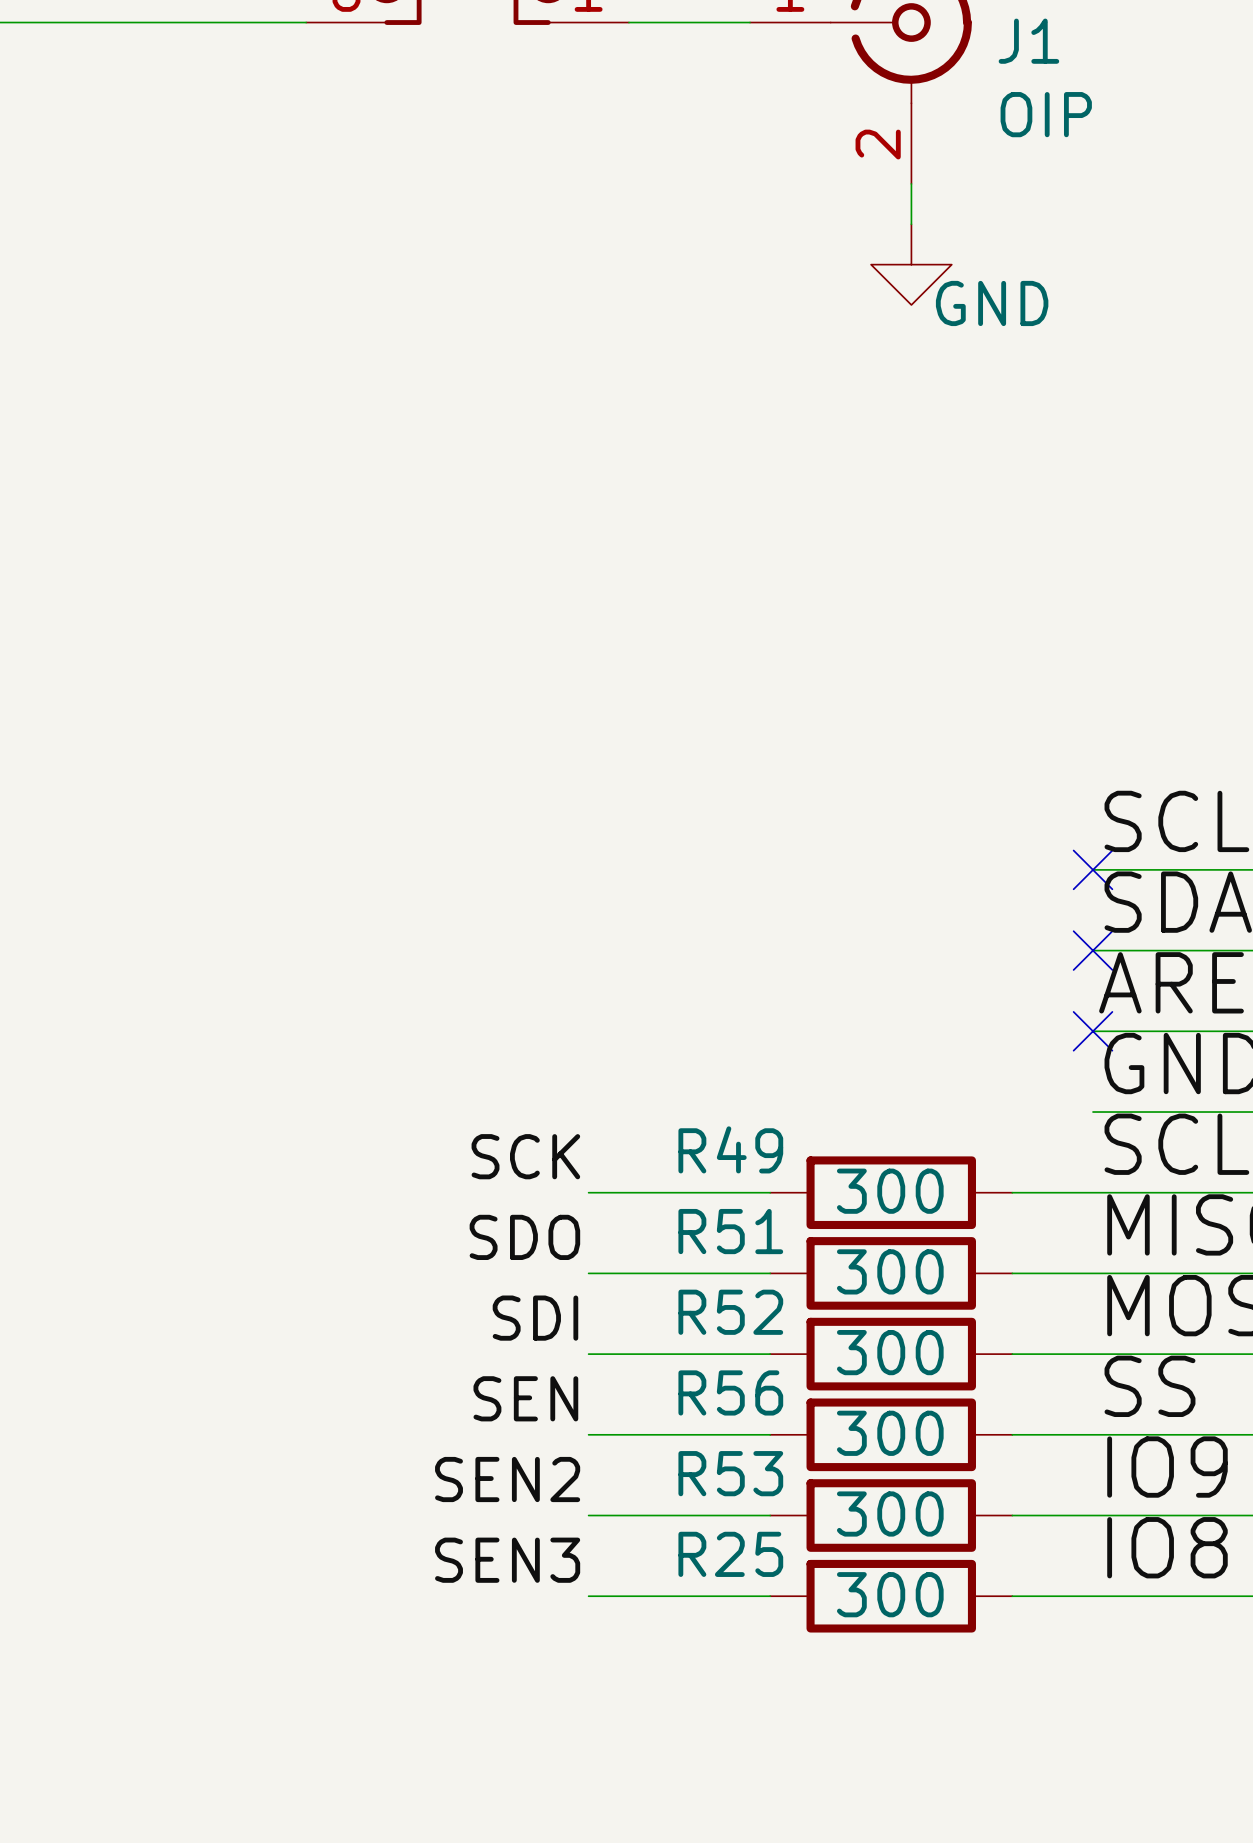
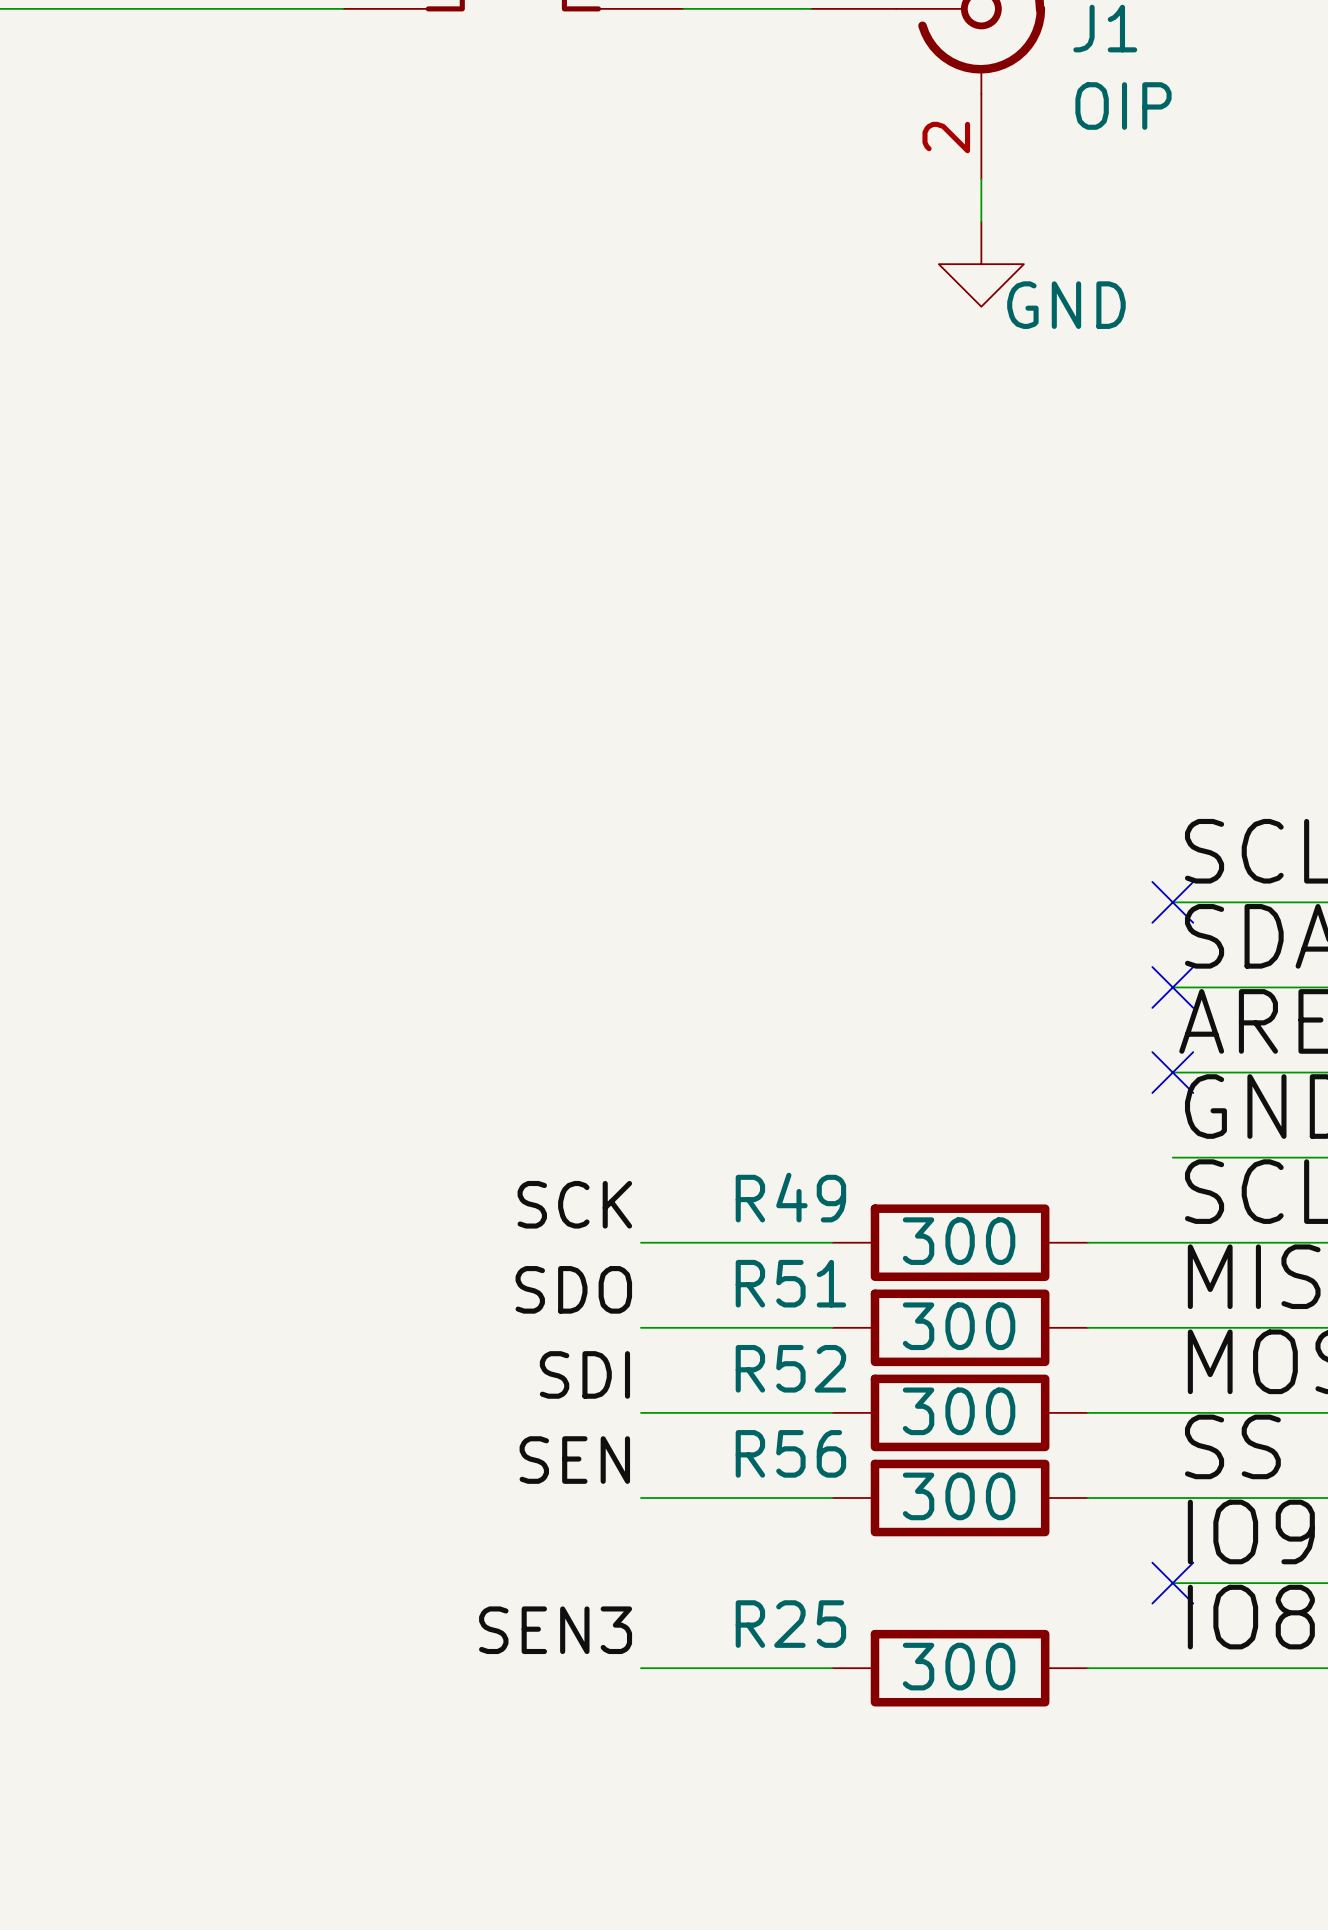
label: SEN2 (507, 1479) -> none
wire: (588, 1515) (770, 1515) -> none
R53: 300 (891, 1515) -> none
wire: (1012, 1515) (1093, 1515) -> none
no-connect mark: none -> (1172, 1583)

